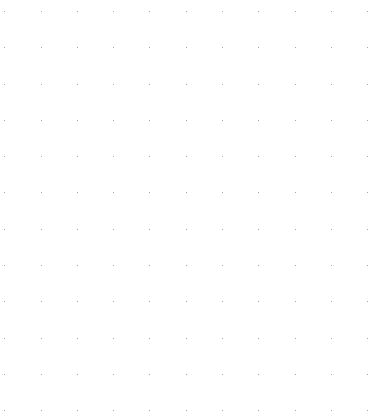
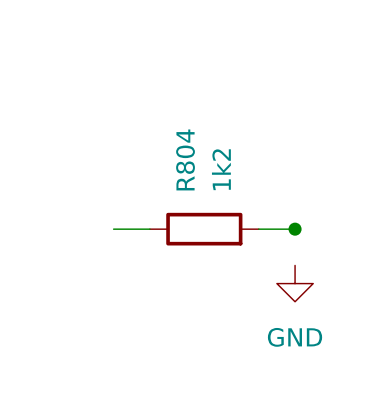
wire: none -> (113, 229) (149, 229)
R804: none -> 1k2 (204, 229)
wire: none -> (258, 229) (295, 229)
junction: none -> (295, 229)
power symbol: none -> GND (295, 283)

